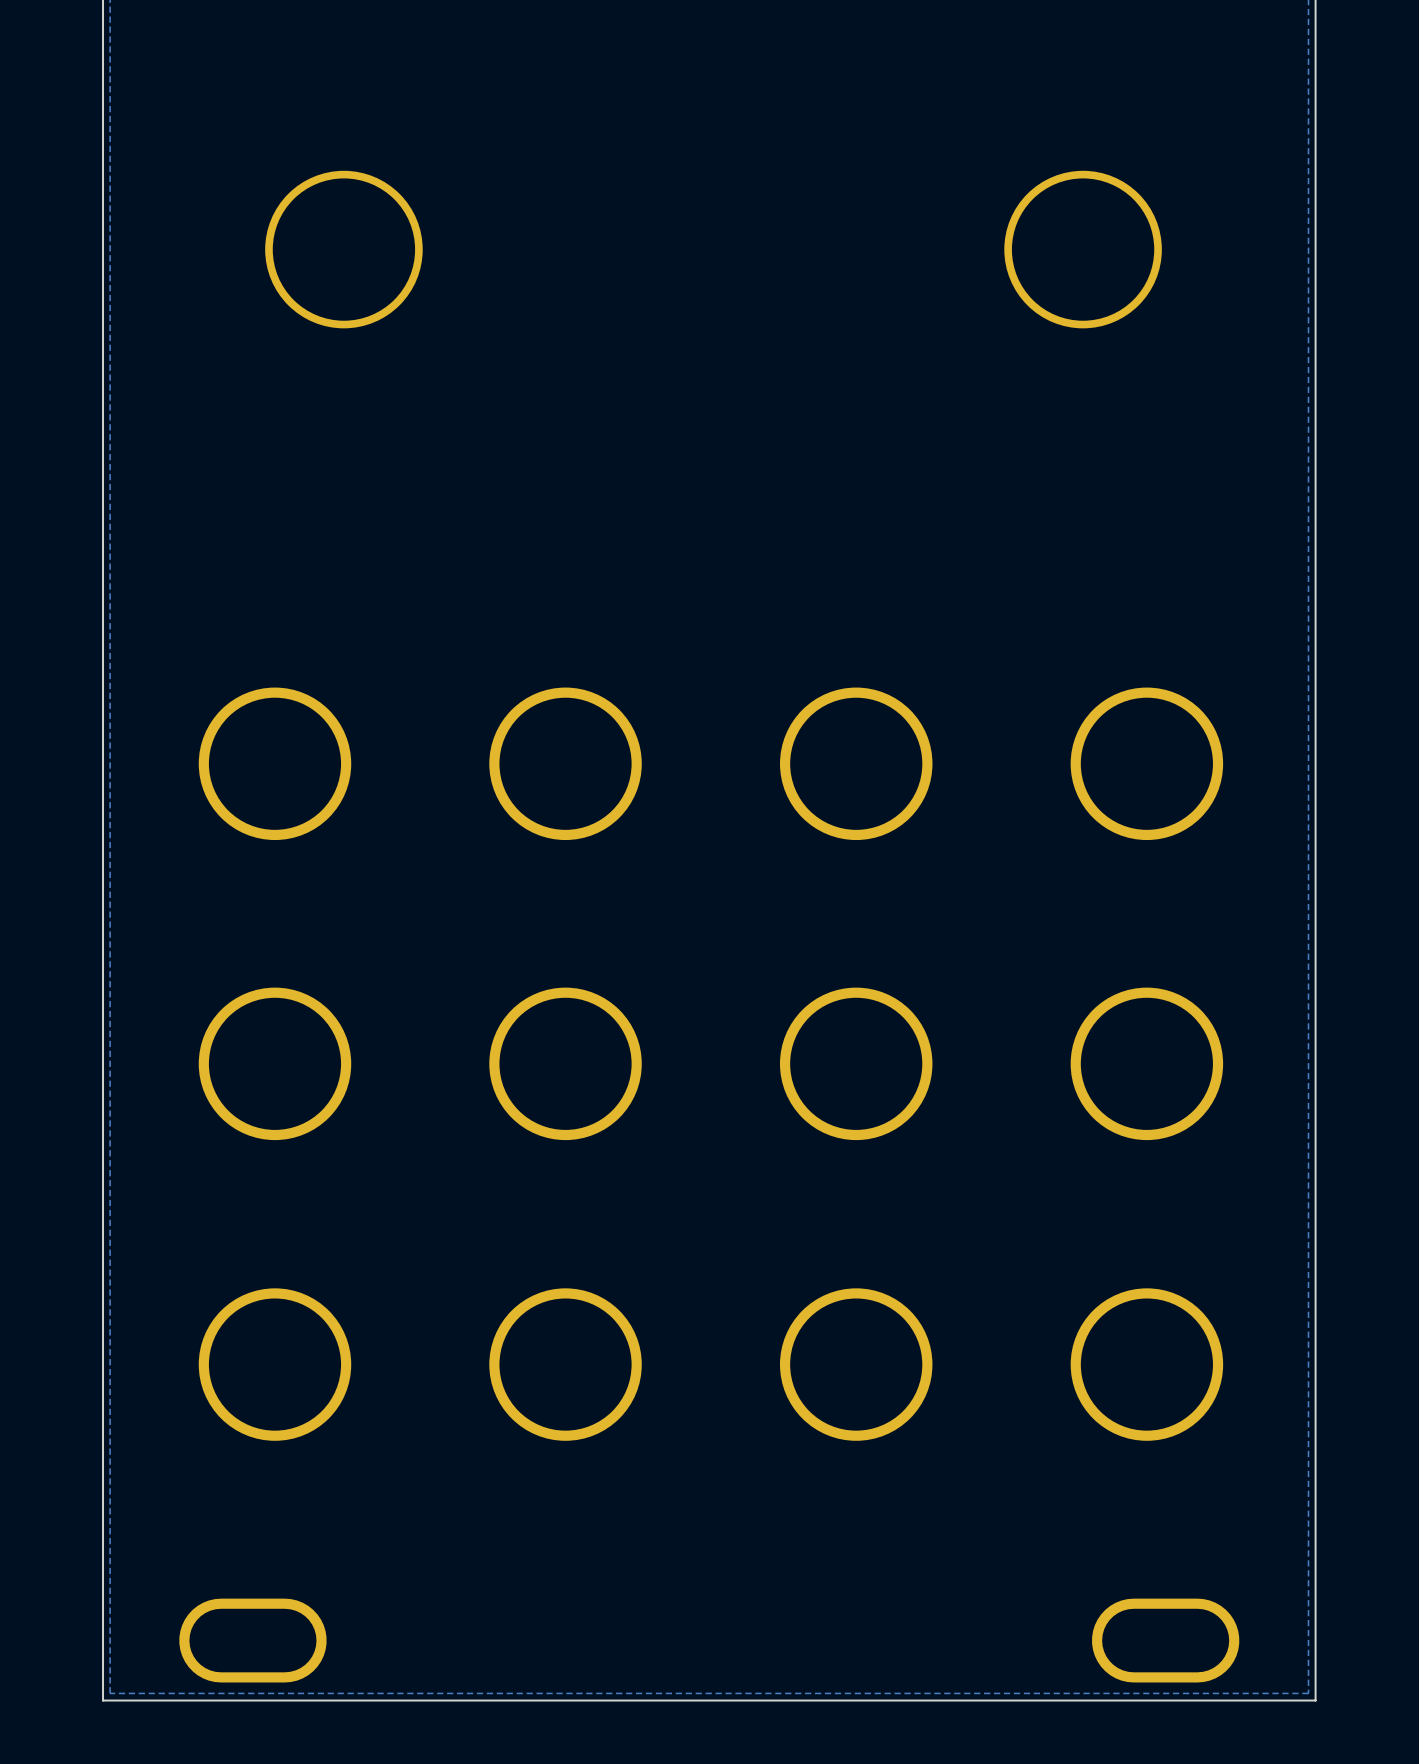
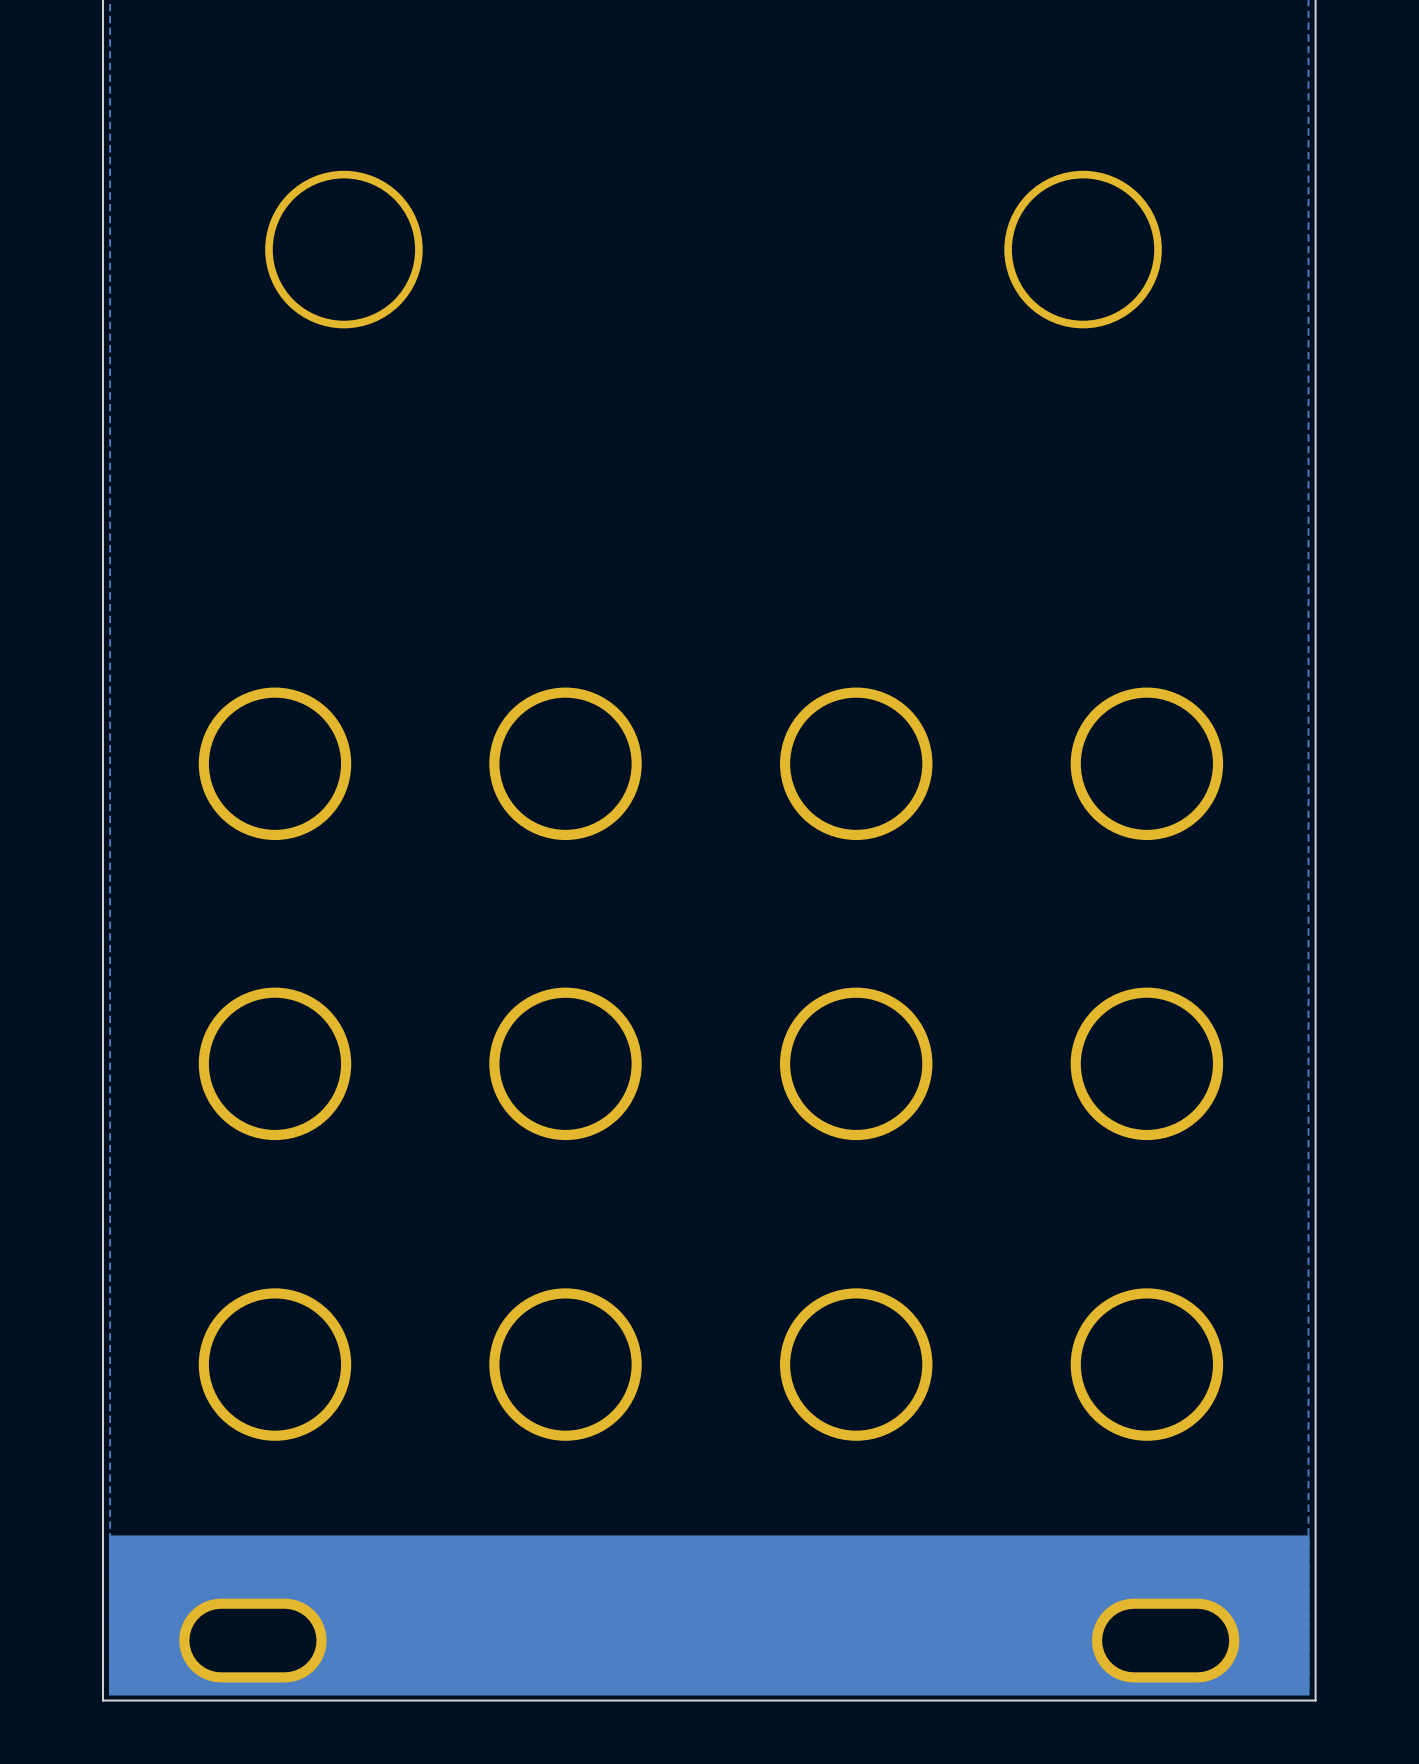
part: none -> (709, 1615)

